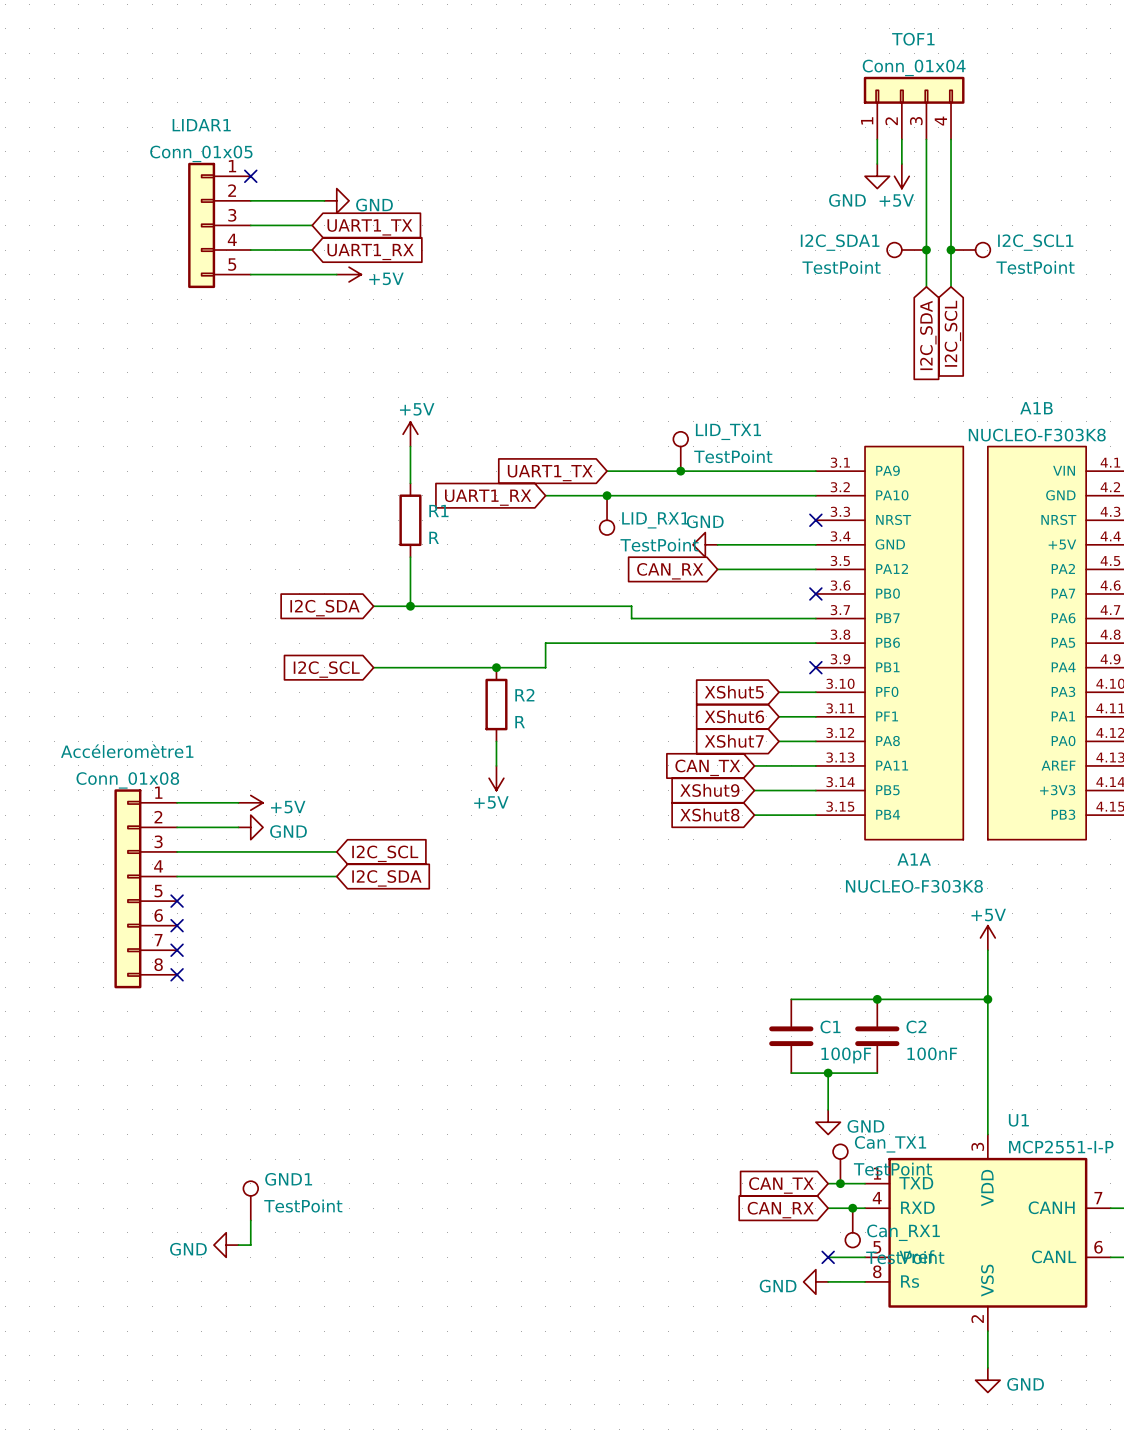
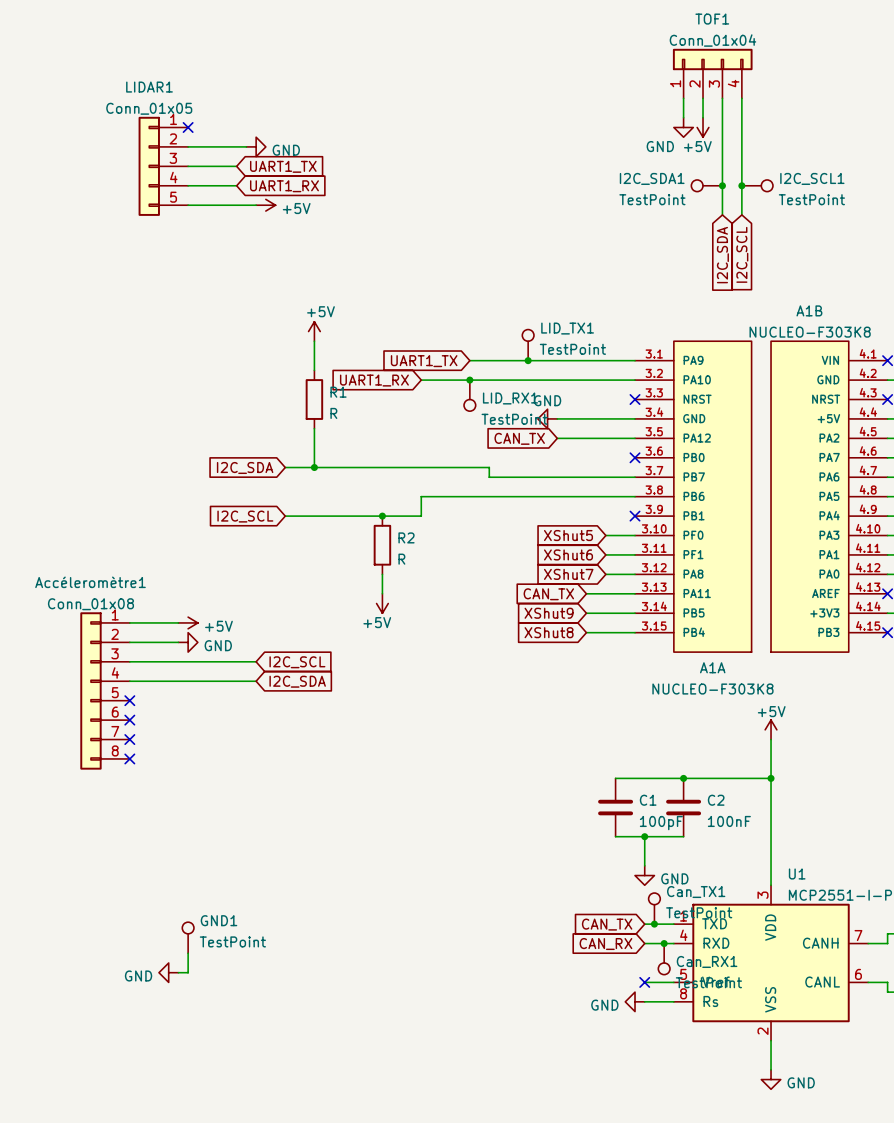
global label: CAN_RX (670, 571) -> CAN_TX (519, 438)

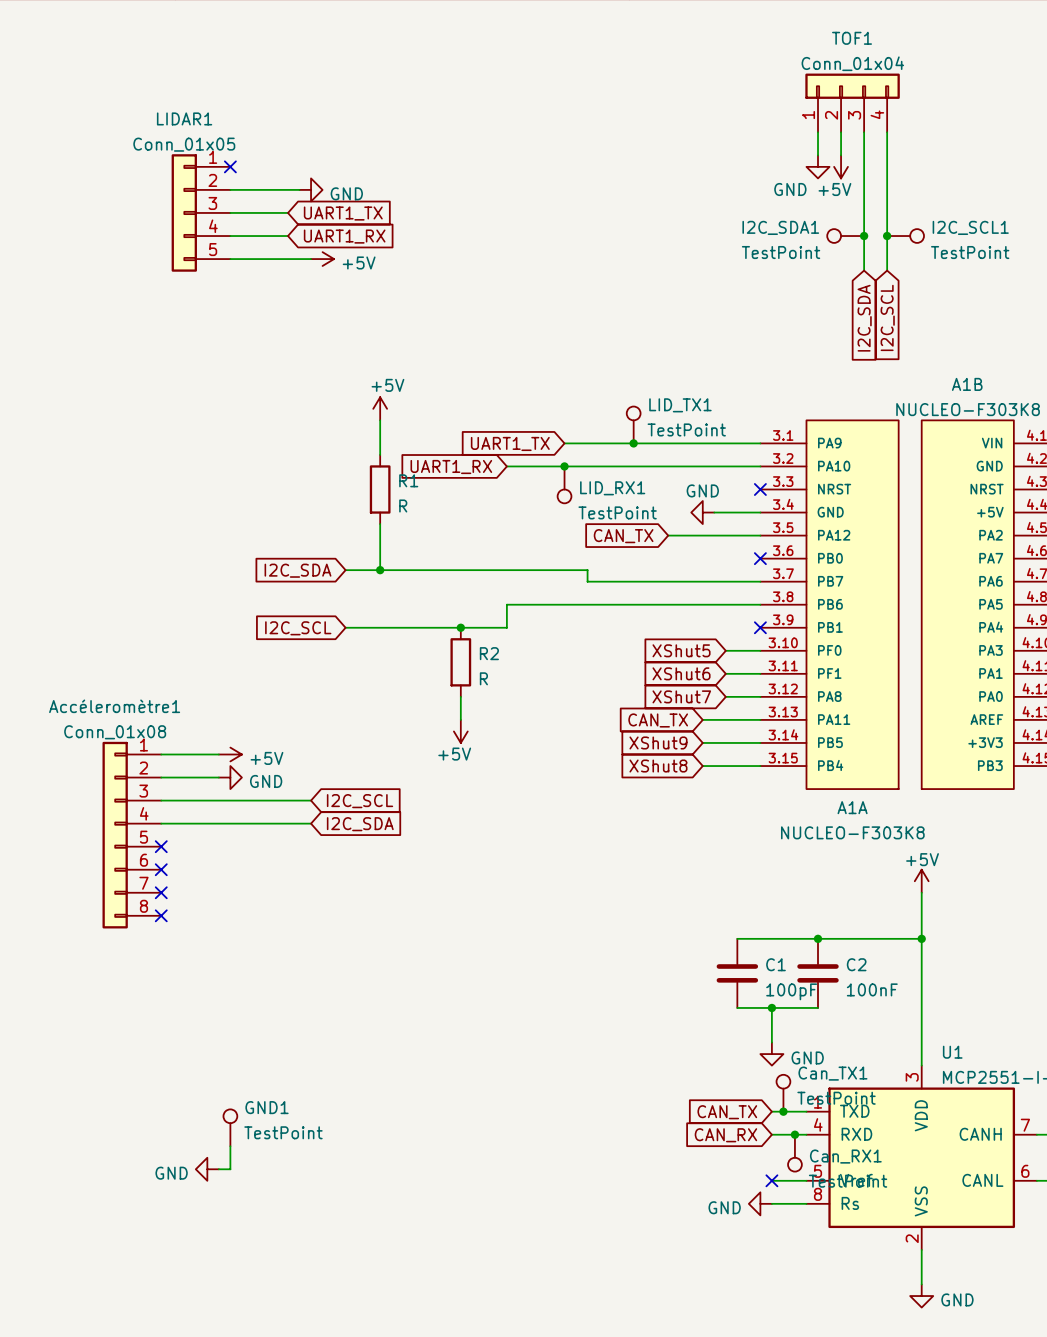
power symbol position: GND (547, 418) -> GND (702, 512)
wire: (557, 418) (596, 418) -> none

